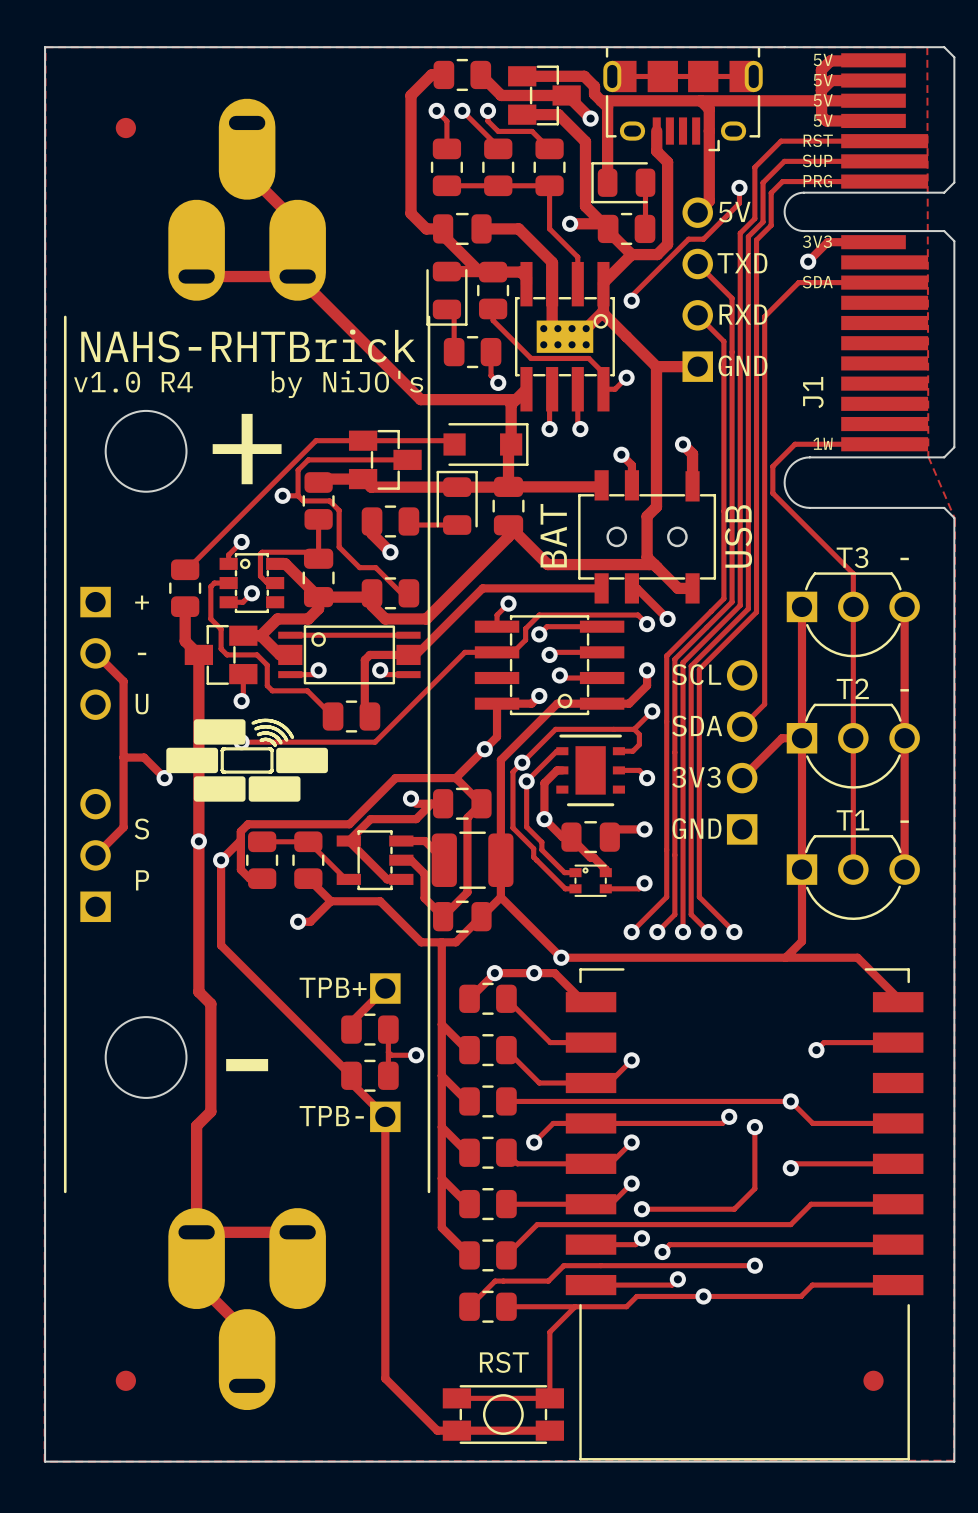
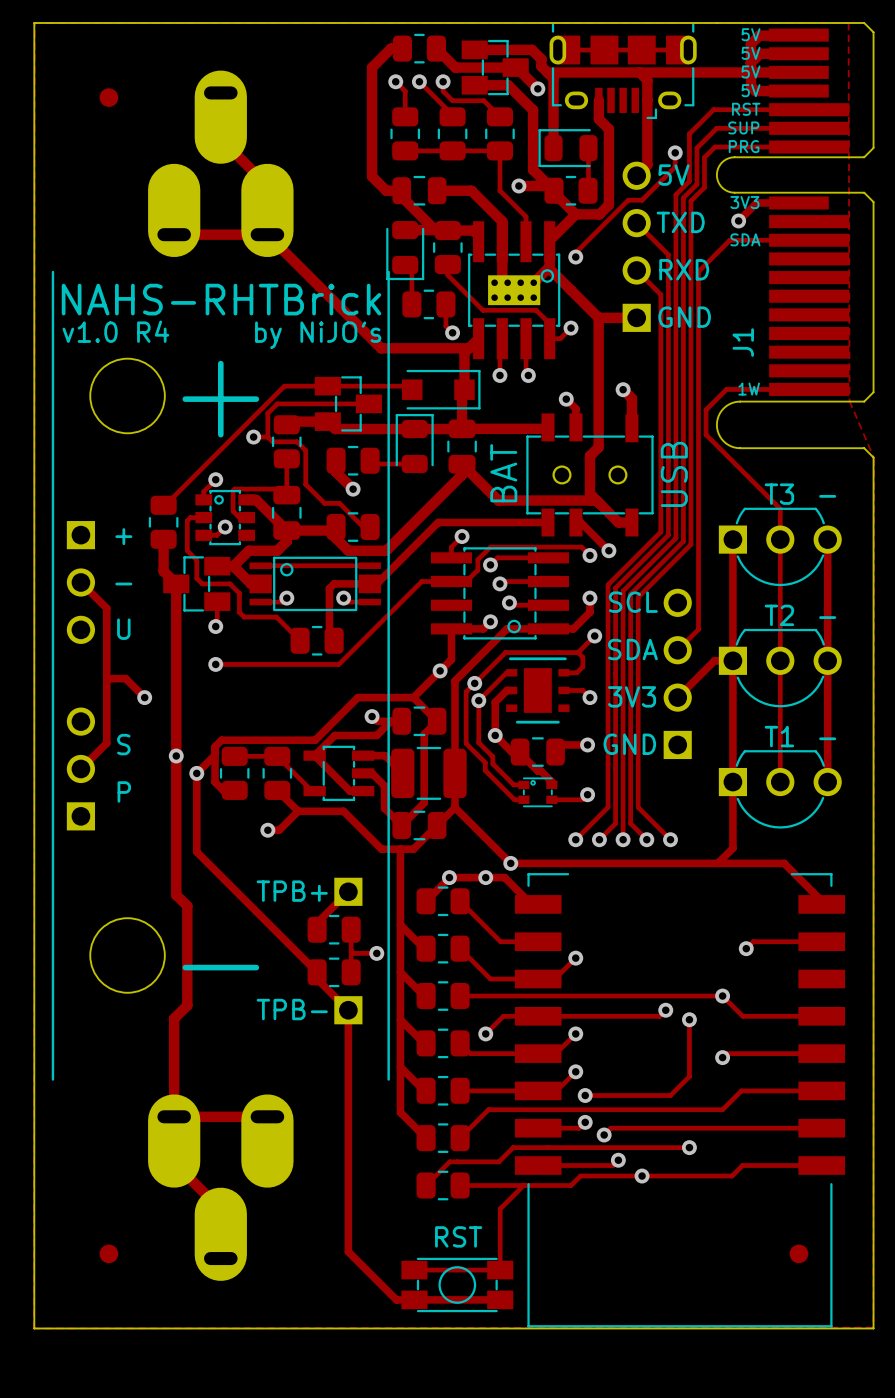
drawing: [166, 718, 328, 802] -> none

